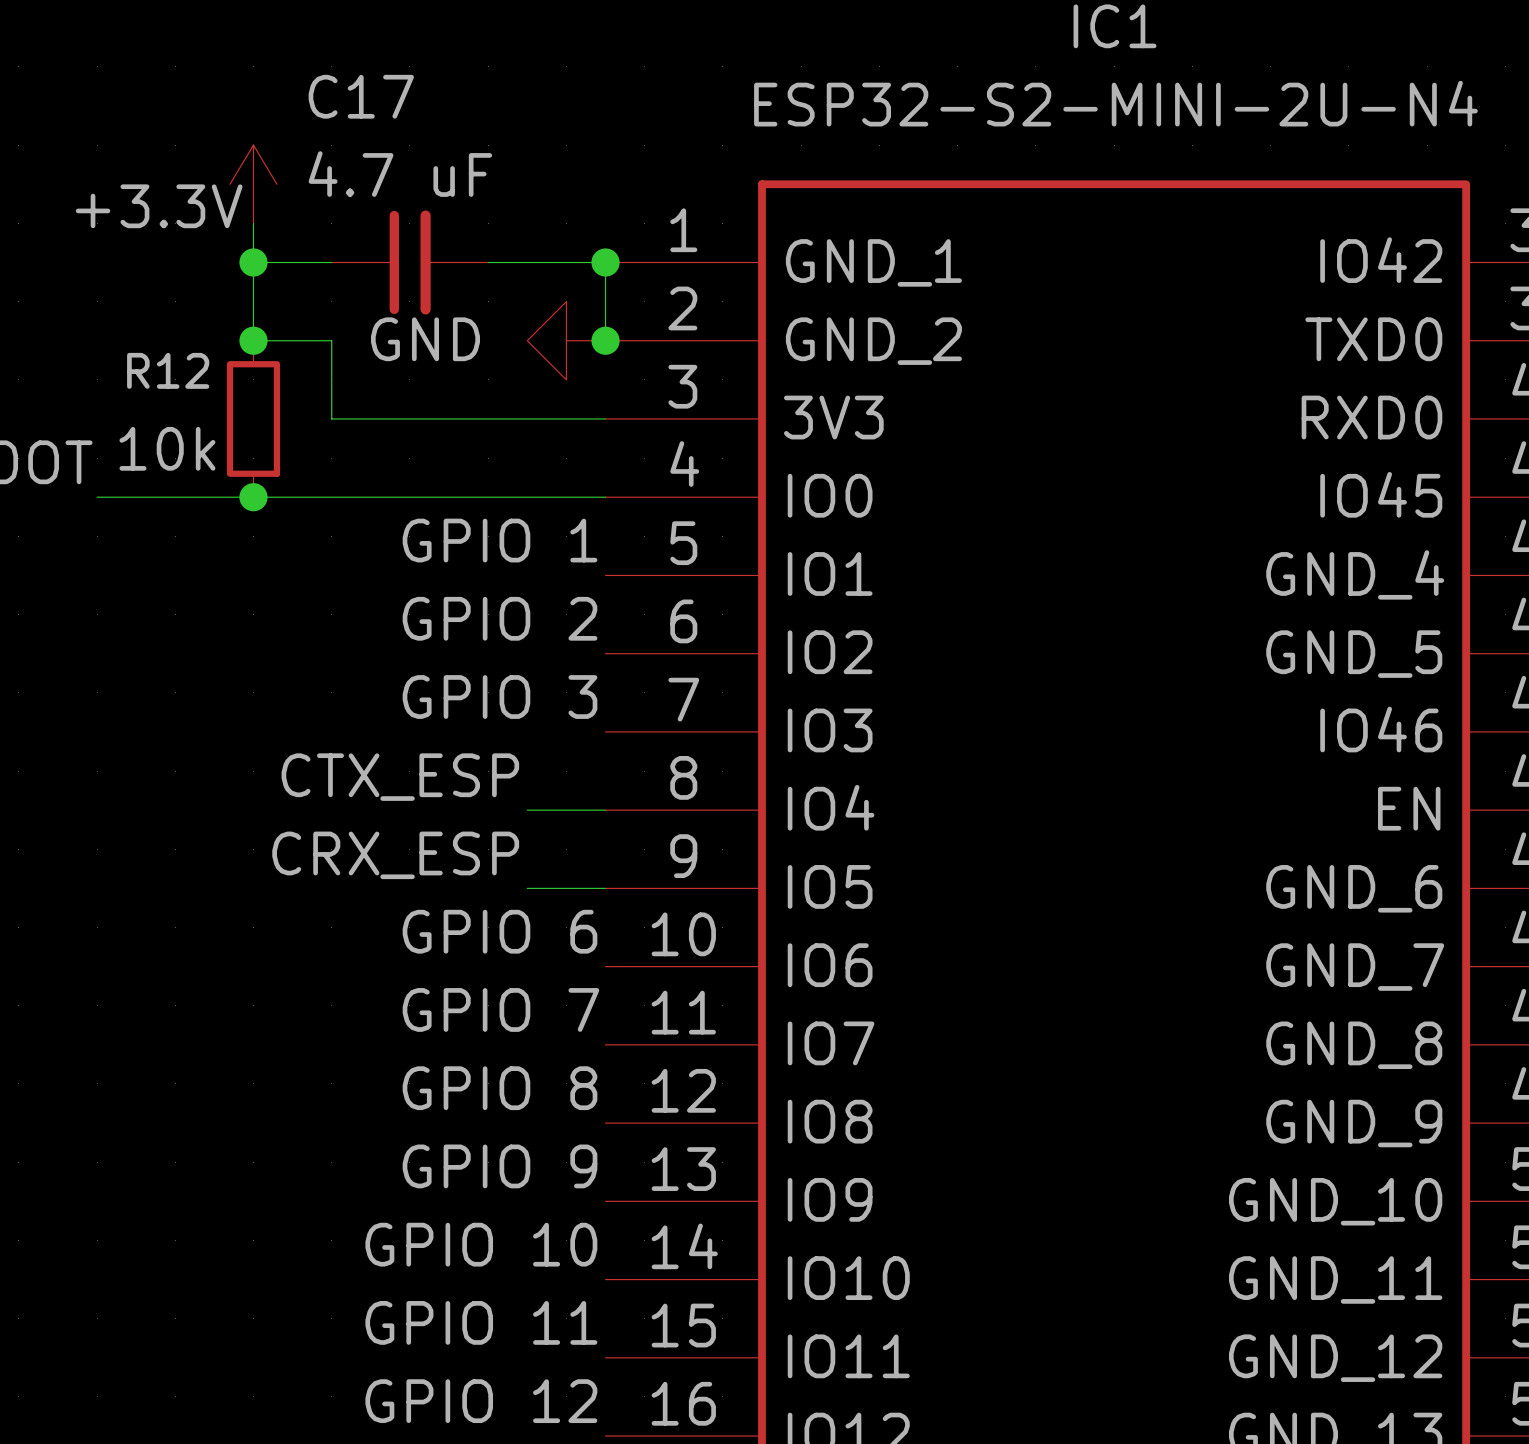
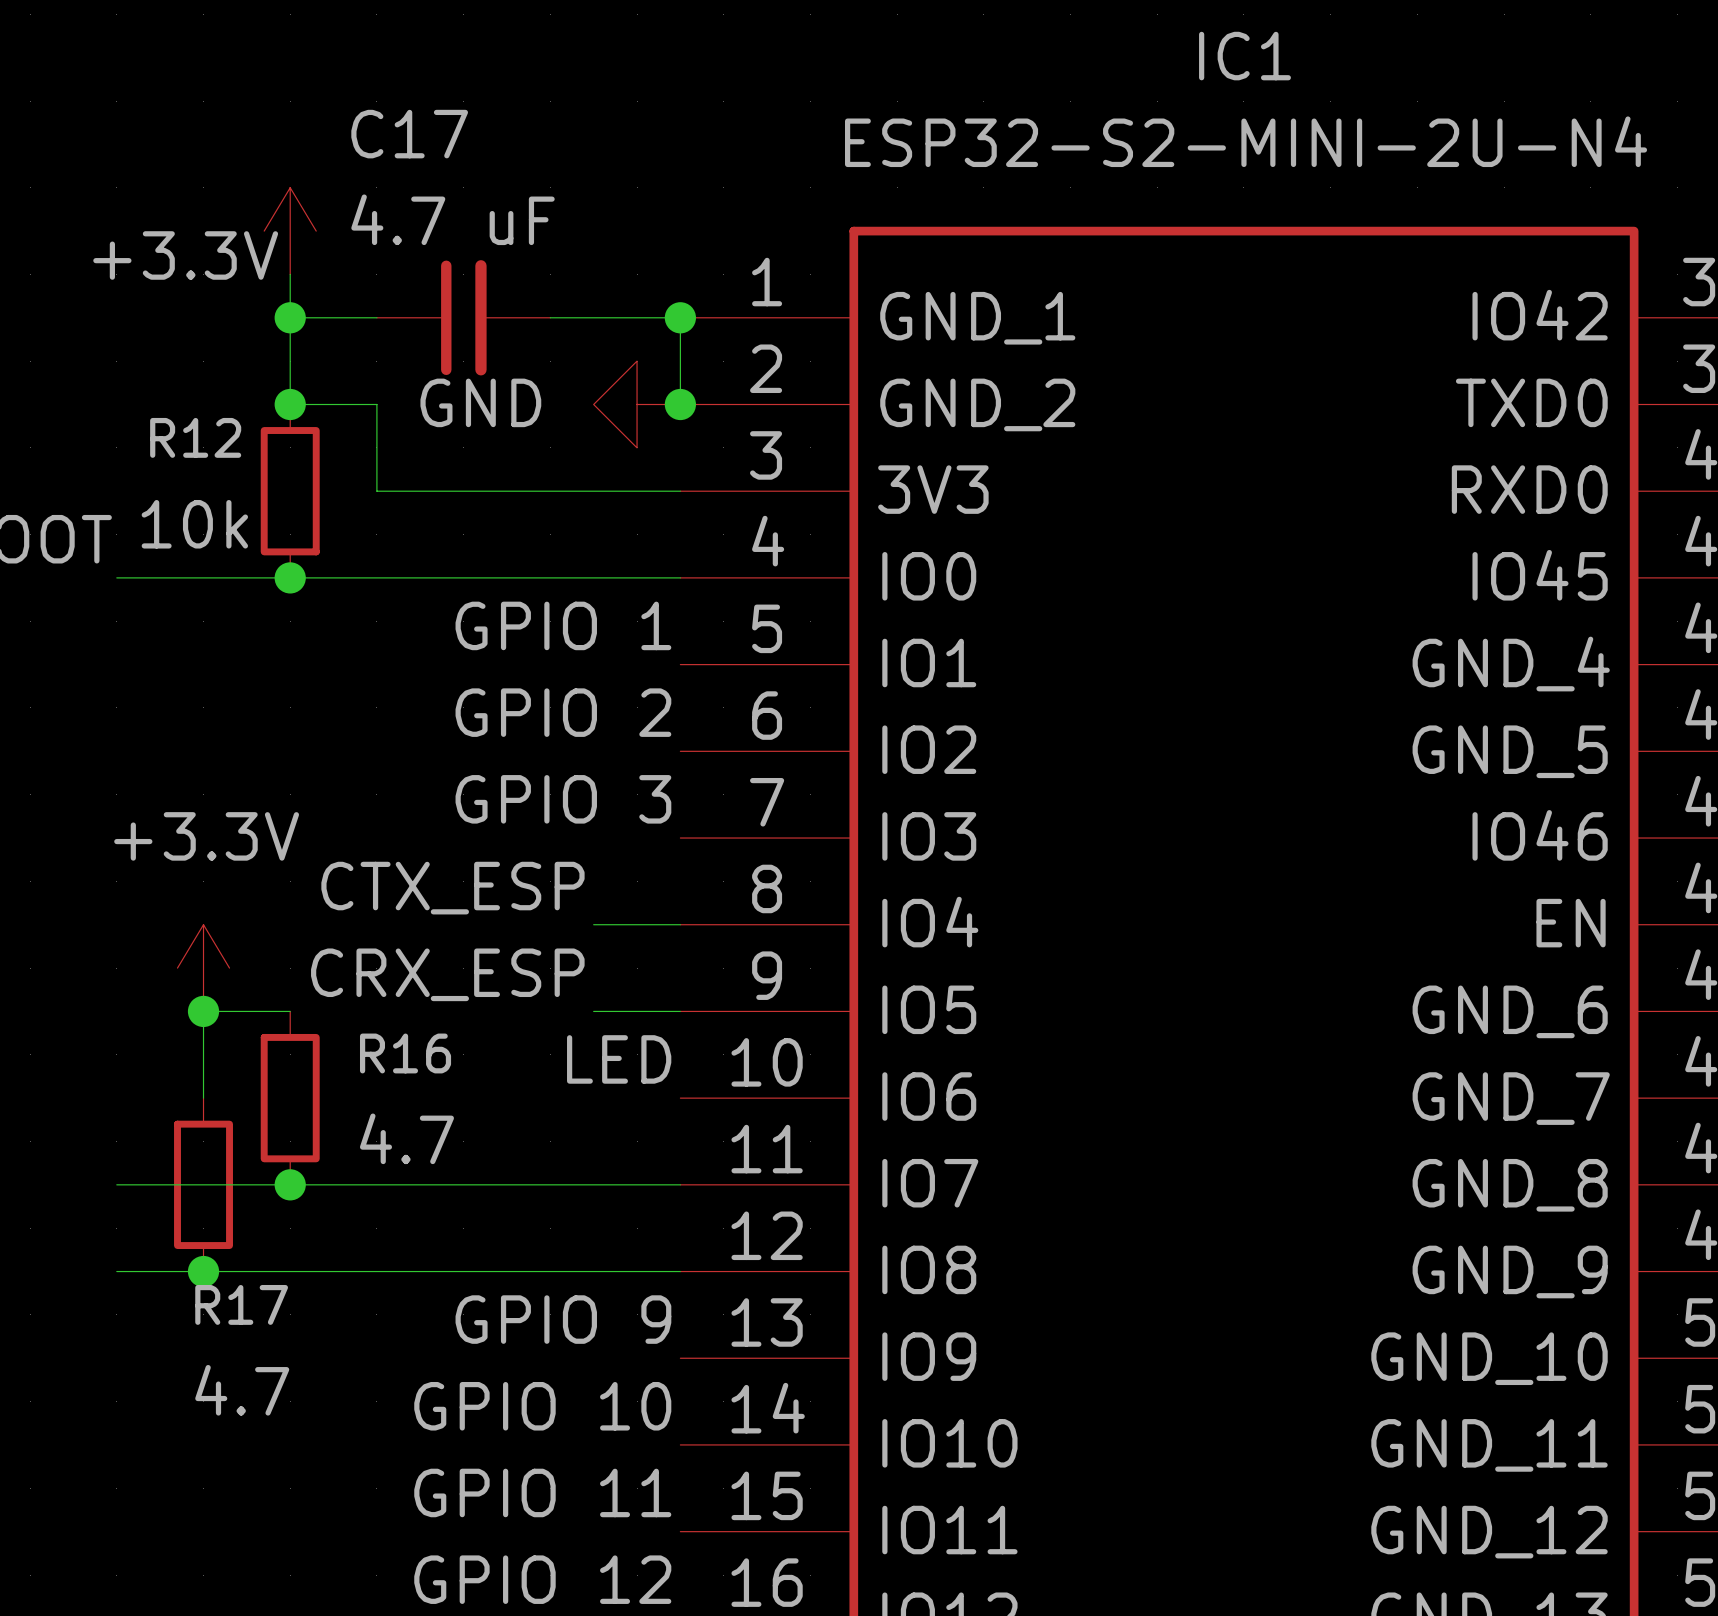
power symbol: none -> +3.3V (203, 968)
junction: none -> (203, 1011)
wire: none -> (290, 1011) (203, 1011) (203, 1098)
label: GPIO 6 (500, 931) -> LED (619, 1059)
R16: none -> 4.7 (290, 1098)
label: GPIO 7 (500, 1009) -> none
wire: none -> (116, 1184) (680, 1184)
R17: none -> 4.7 (203, 1184)
junction: none -> (290, 1184)
label: GPIO 8 (500, 1088) -> none
wire: none -> (116, 1271) (680, 1271)
junction: none -> (203, 1271)

